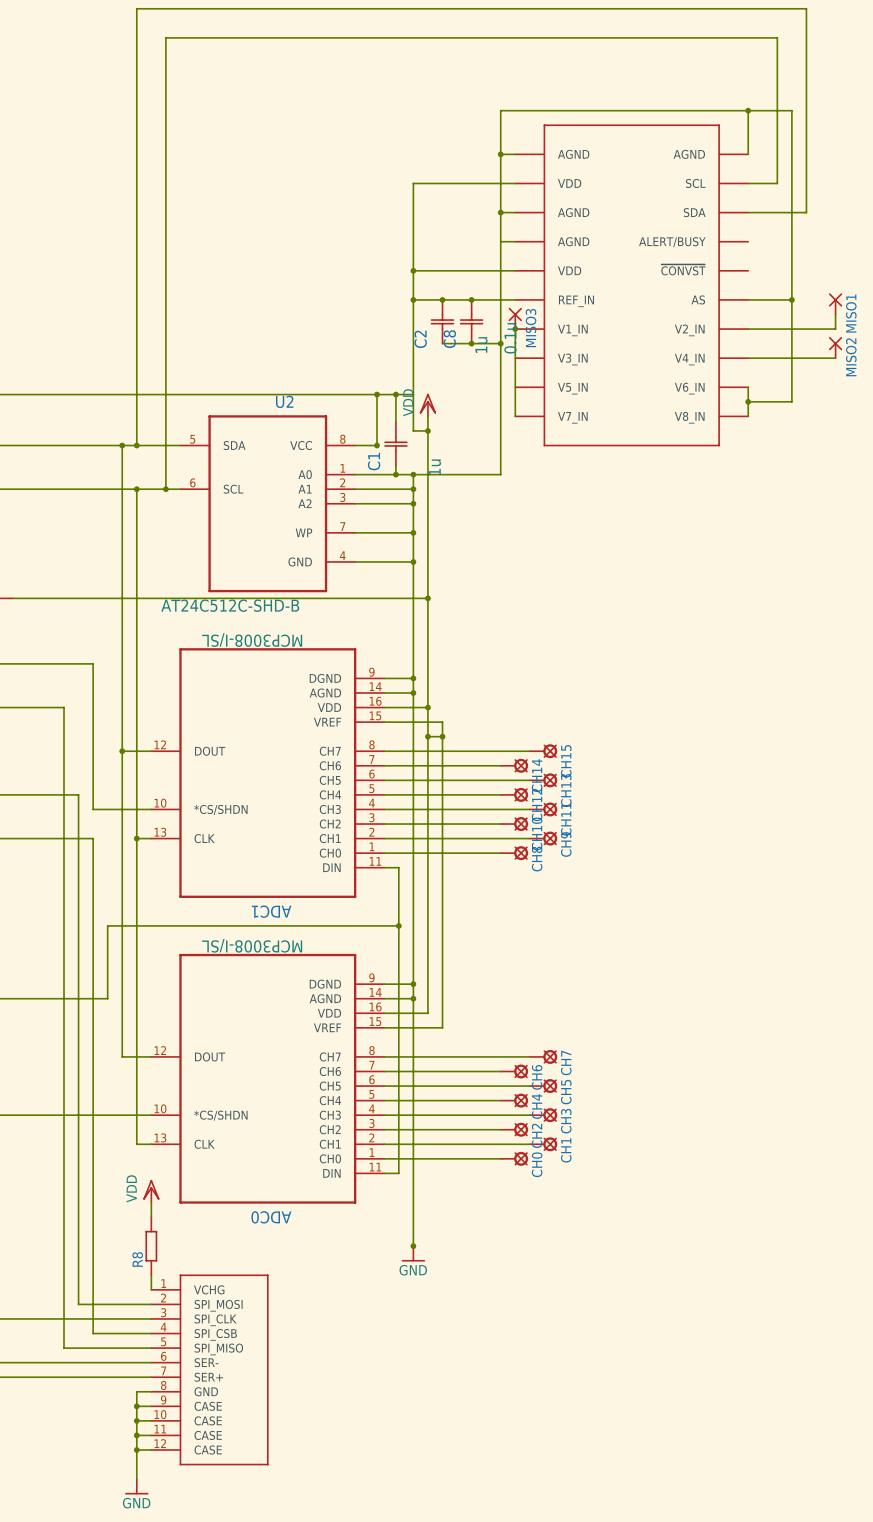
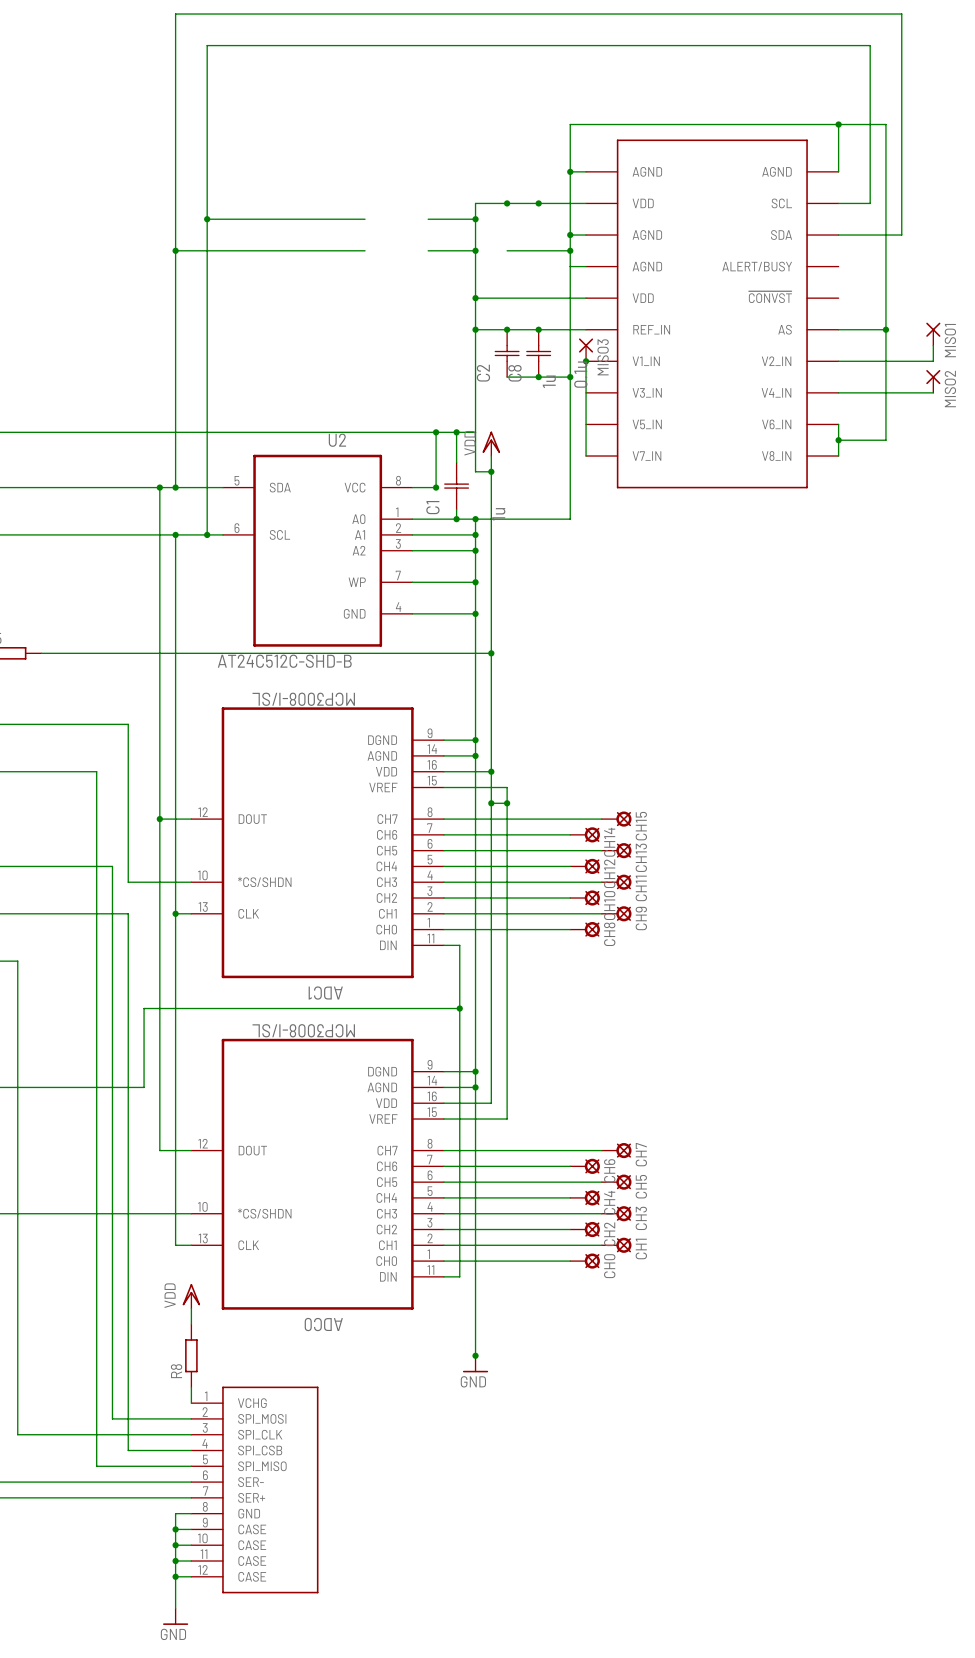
junction: none -> (507, 203)
junction: none -> (538, 203)
wire: none -> (207, 219) (365, 219)
junction: none -> (207, 219)
wire: none -> (428, 219) (475, 219)
junction: none -> (475, 219)
wire: none -> (175, 250) (365, 250)
junction: none -> (175, 250)
wire: none -> (428, 250) (475, 250)
junction: none -> (475, 250)
wire: none -> (507, 250) (570, 250)
junction: none -> (570, 250)

